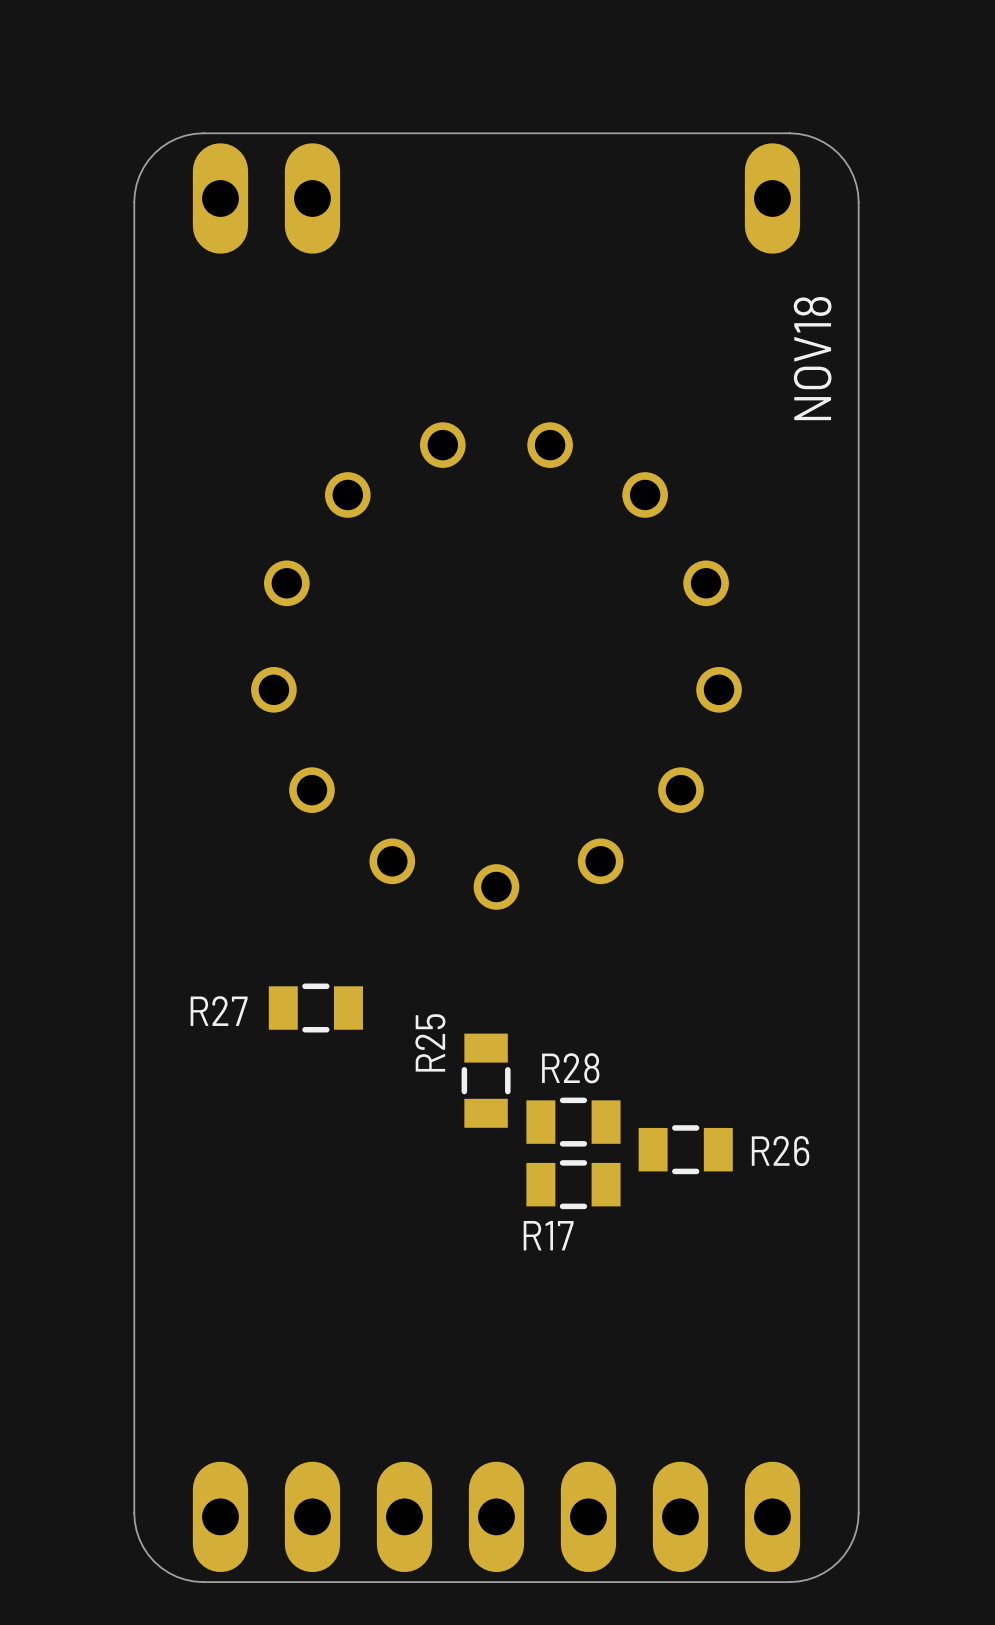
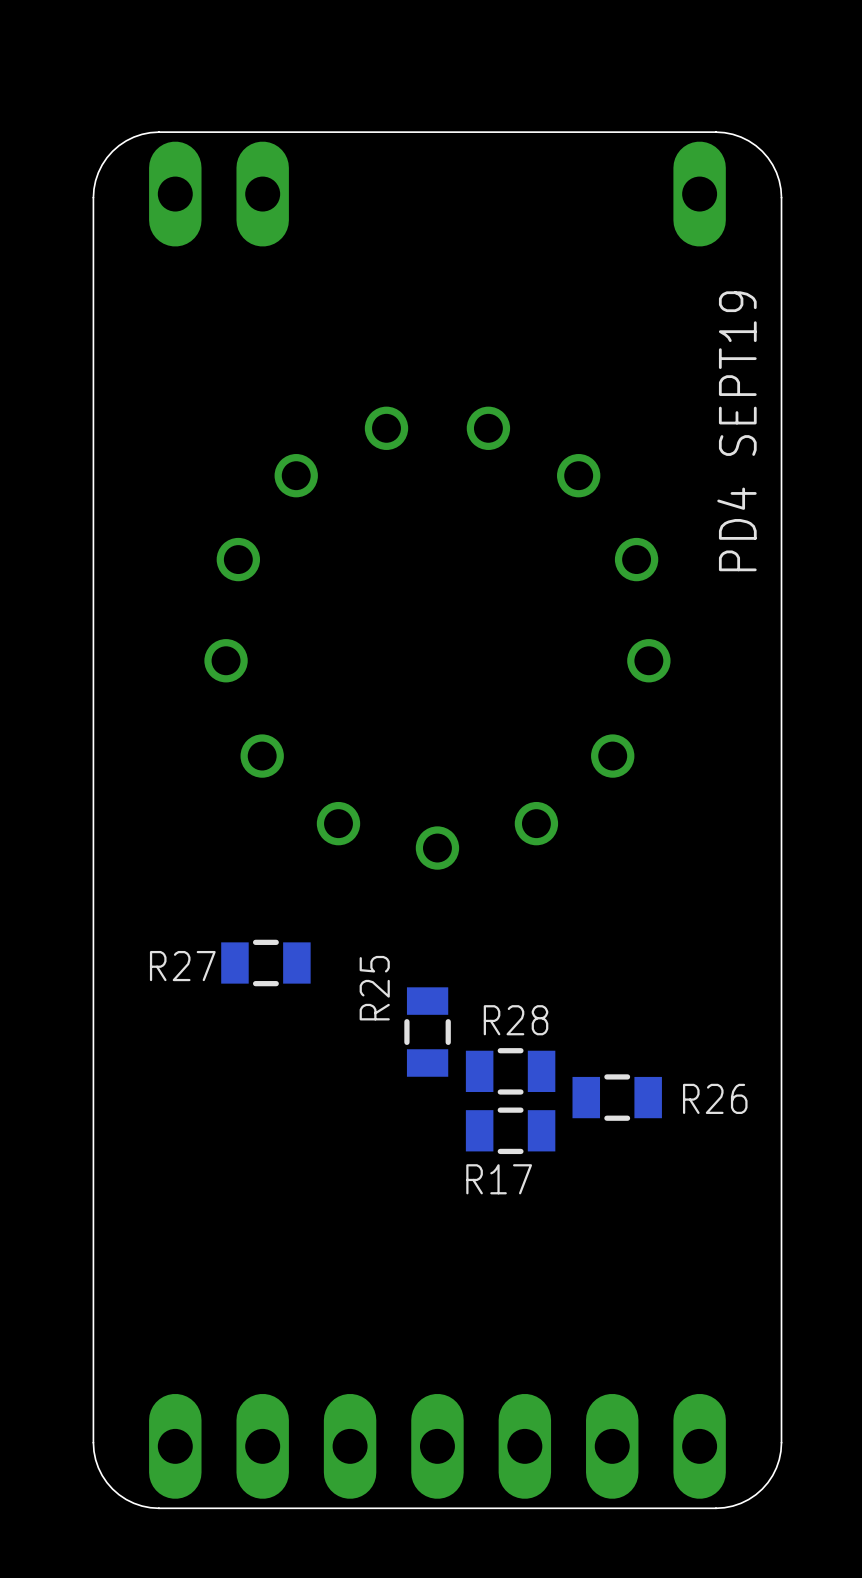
text: NOV18 (812, 358) -> PD4 SEPT19 (736, 431)

